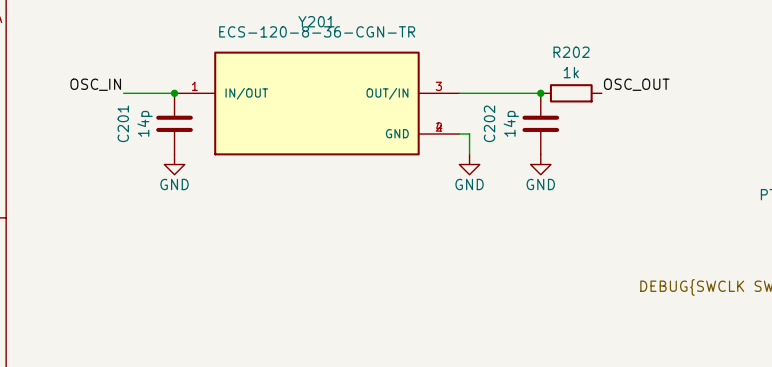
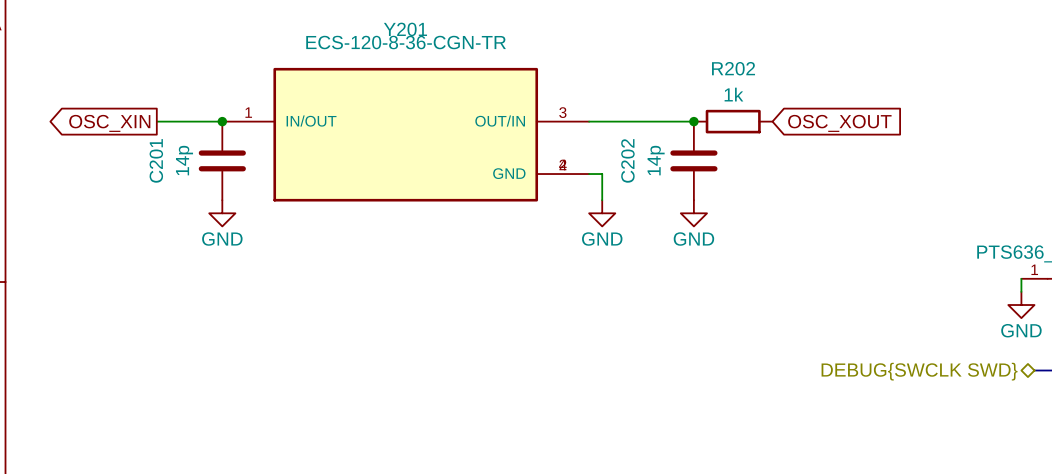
label: OSC_IN (95, 84) -> none
label: OSC_OUT (636, 84) -> none
global label: none -> OSC_XIN (109, 123)
global label: none -> OSC_XOUT (839, 123)

